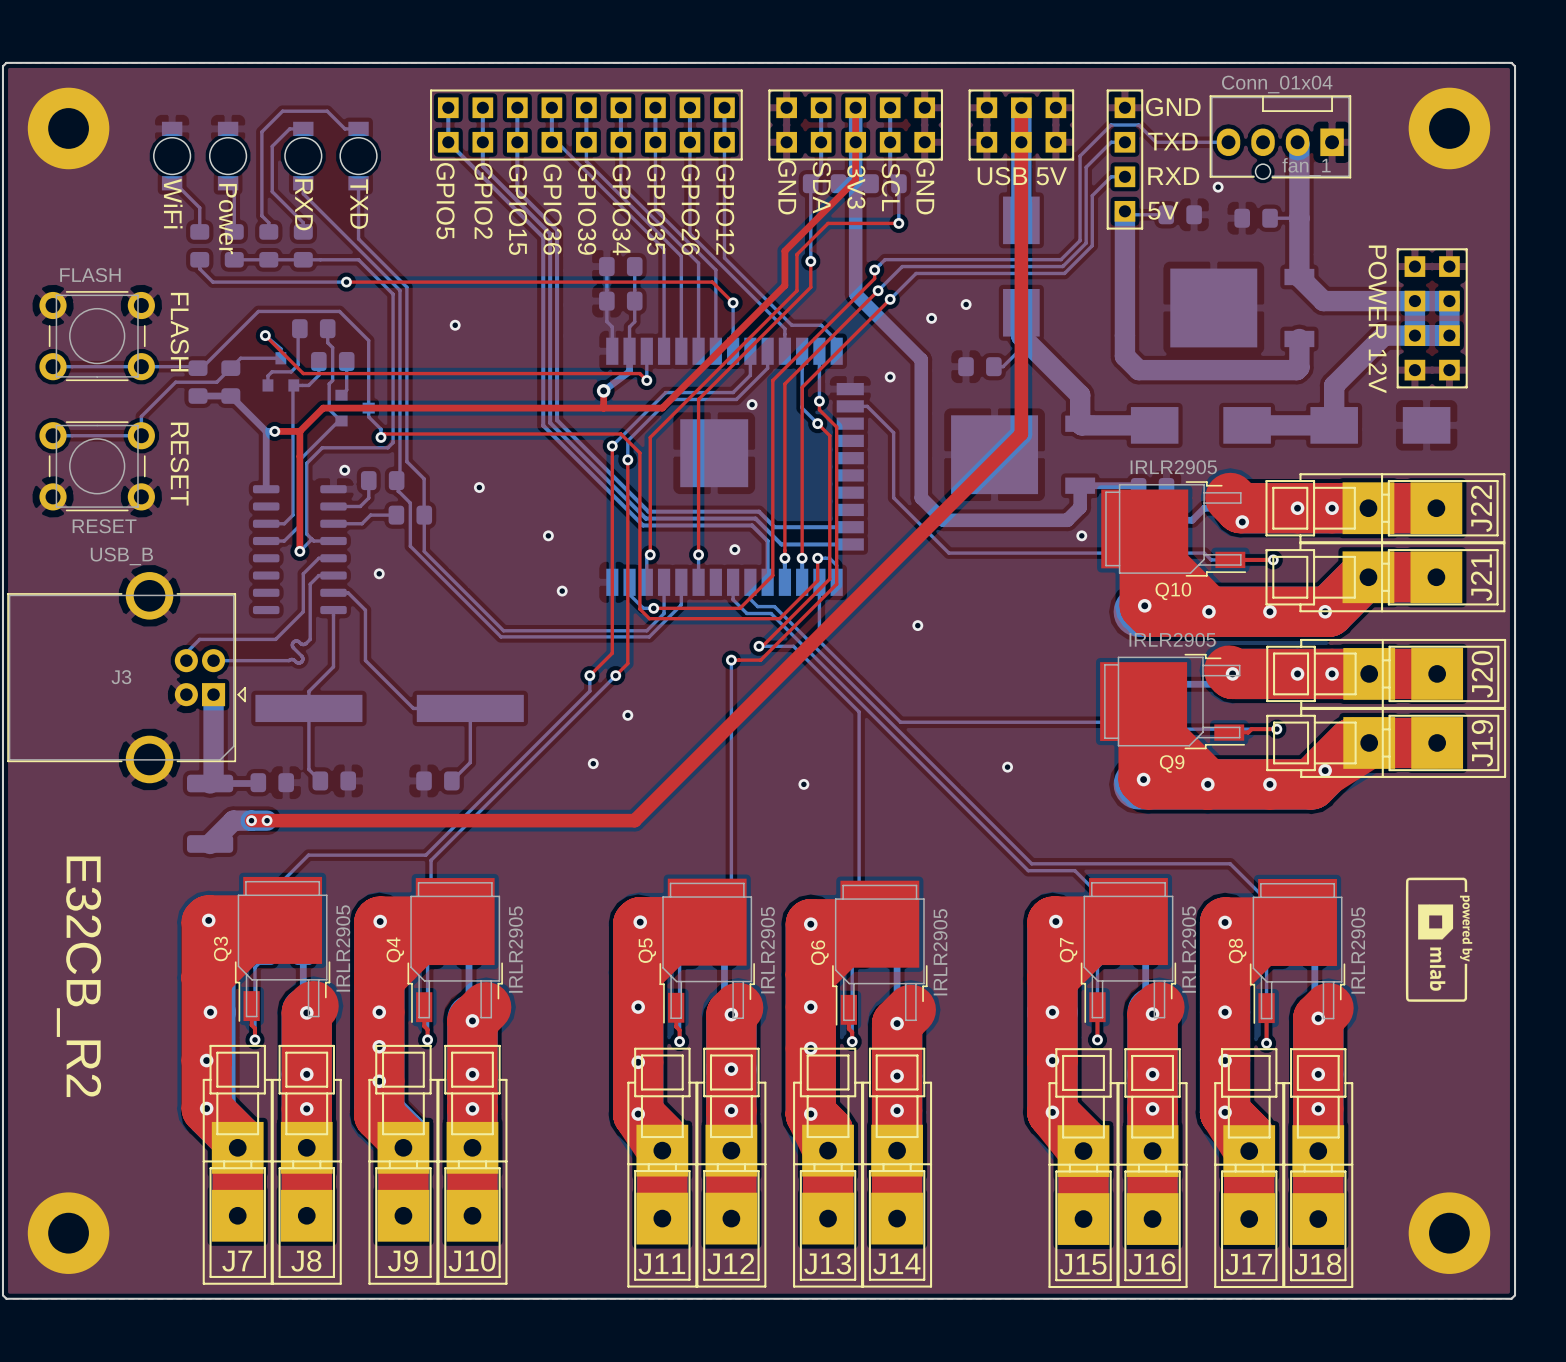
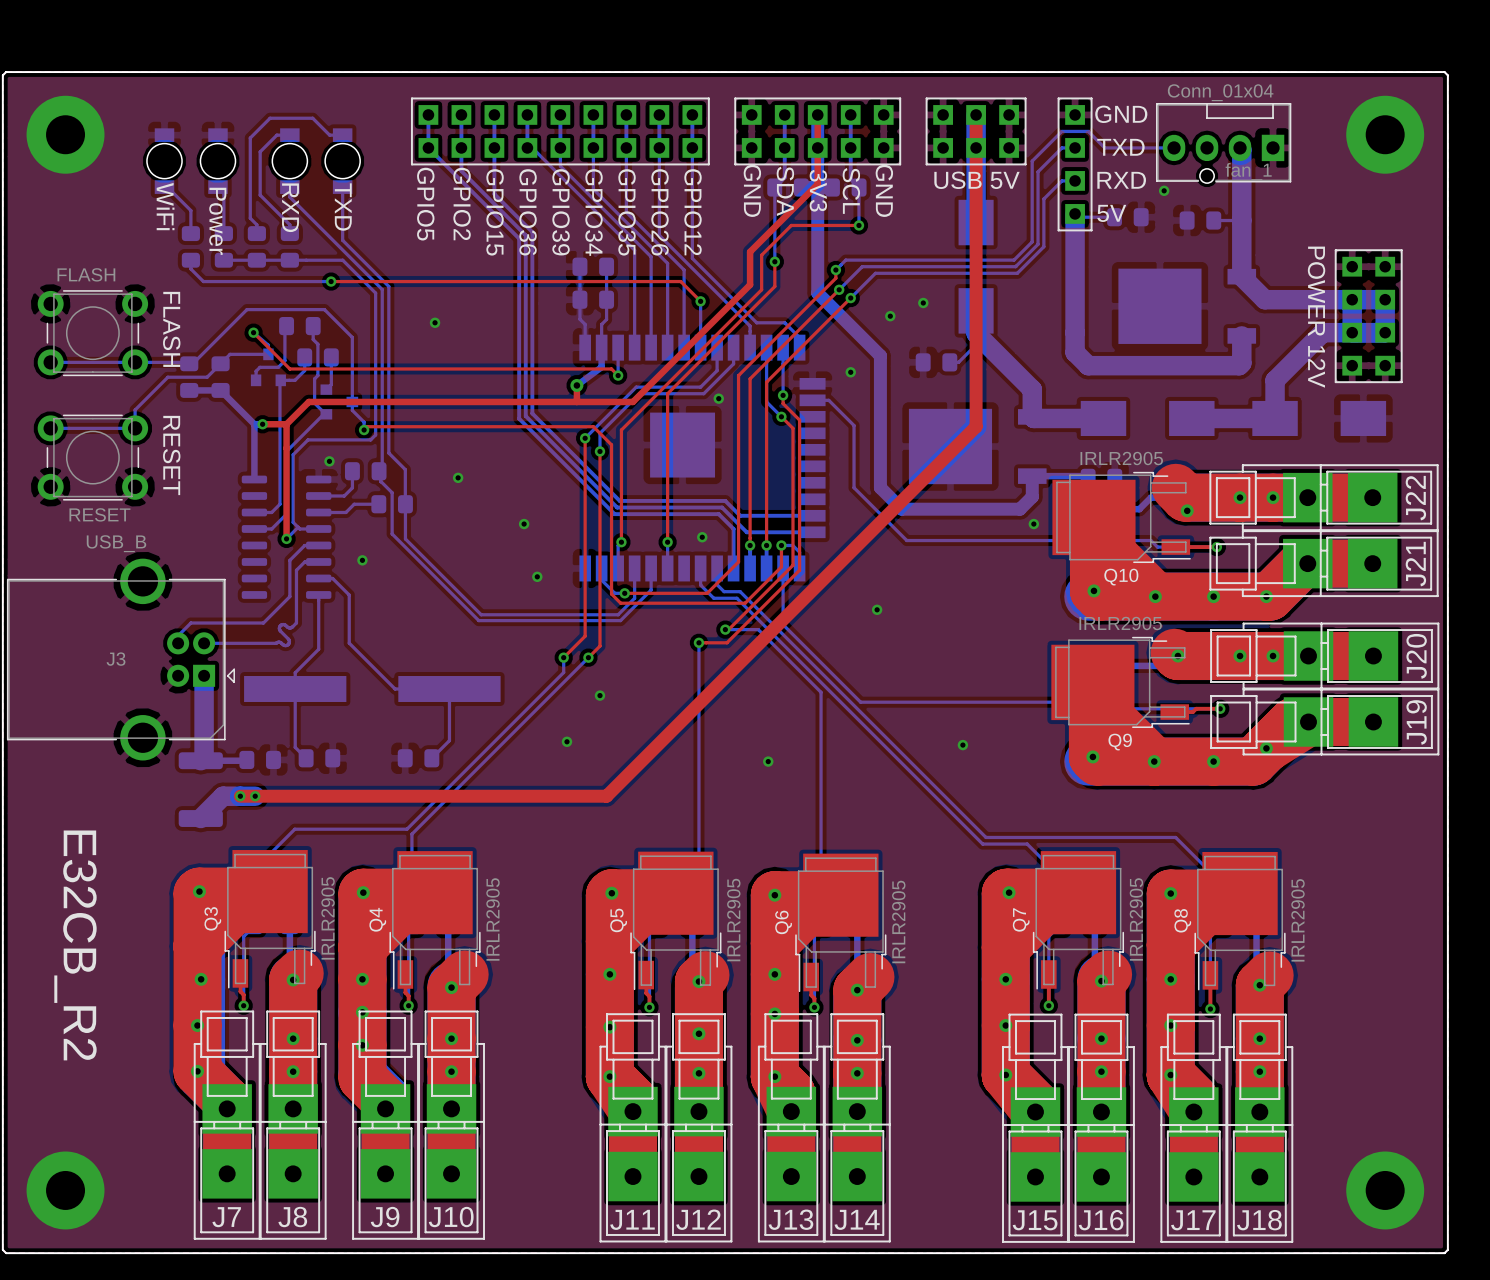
drawing: [1405, 877, 1473, 1002] -> none

